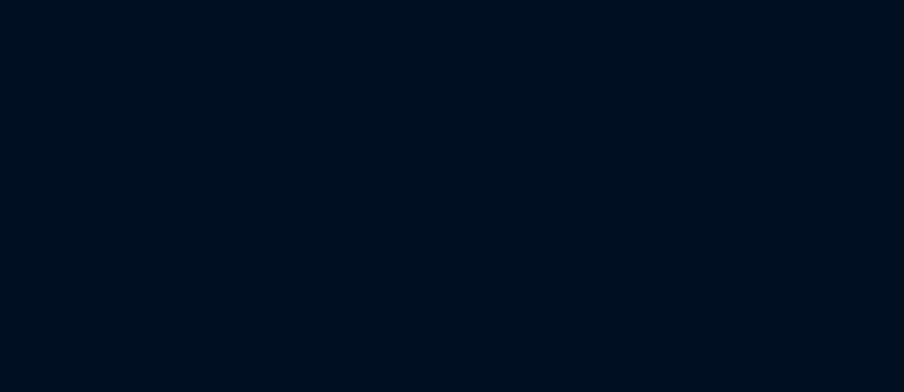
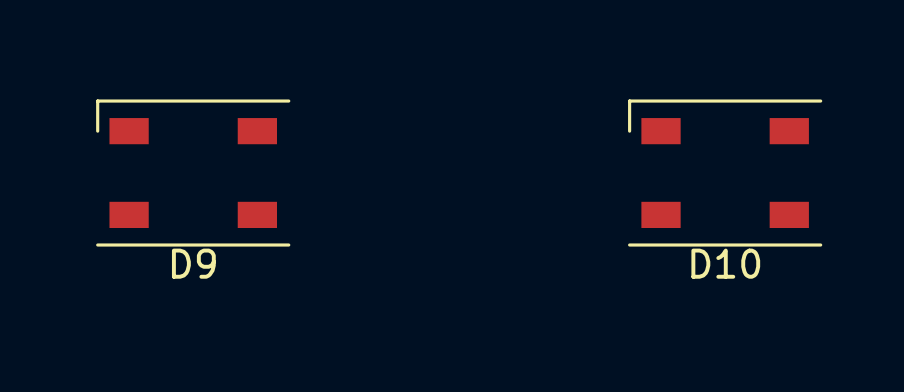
D9: none -> (193, 173)
D10: none -> (725, 173)

